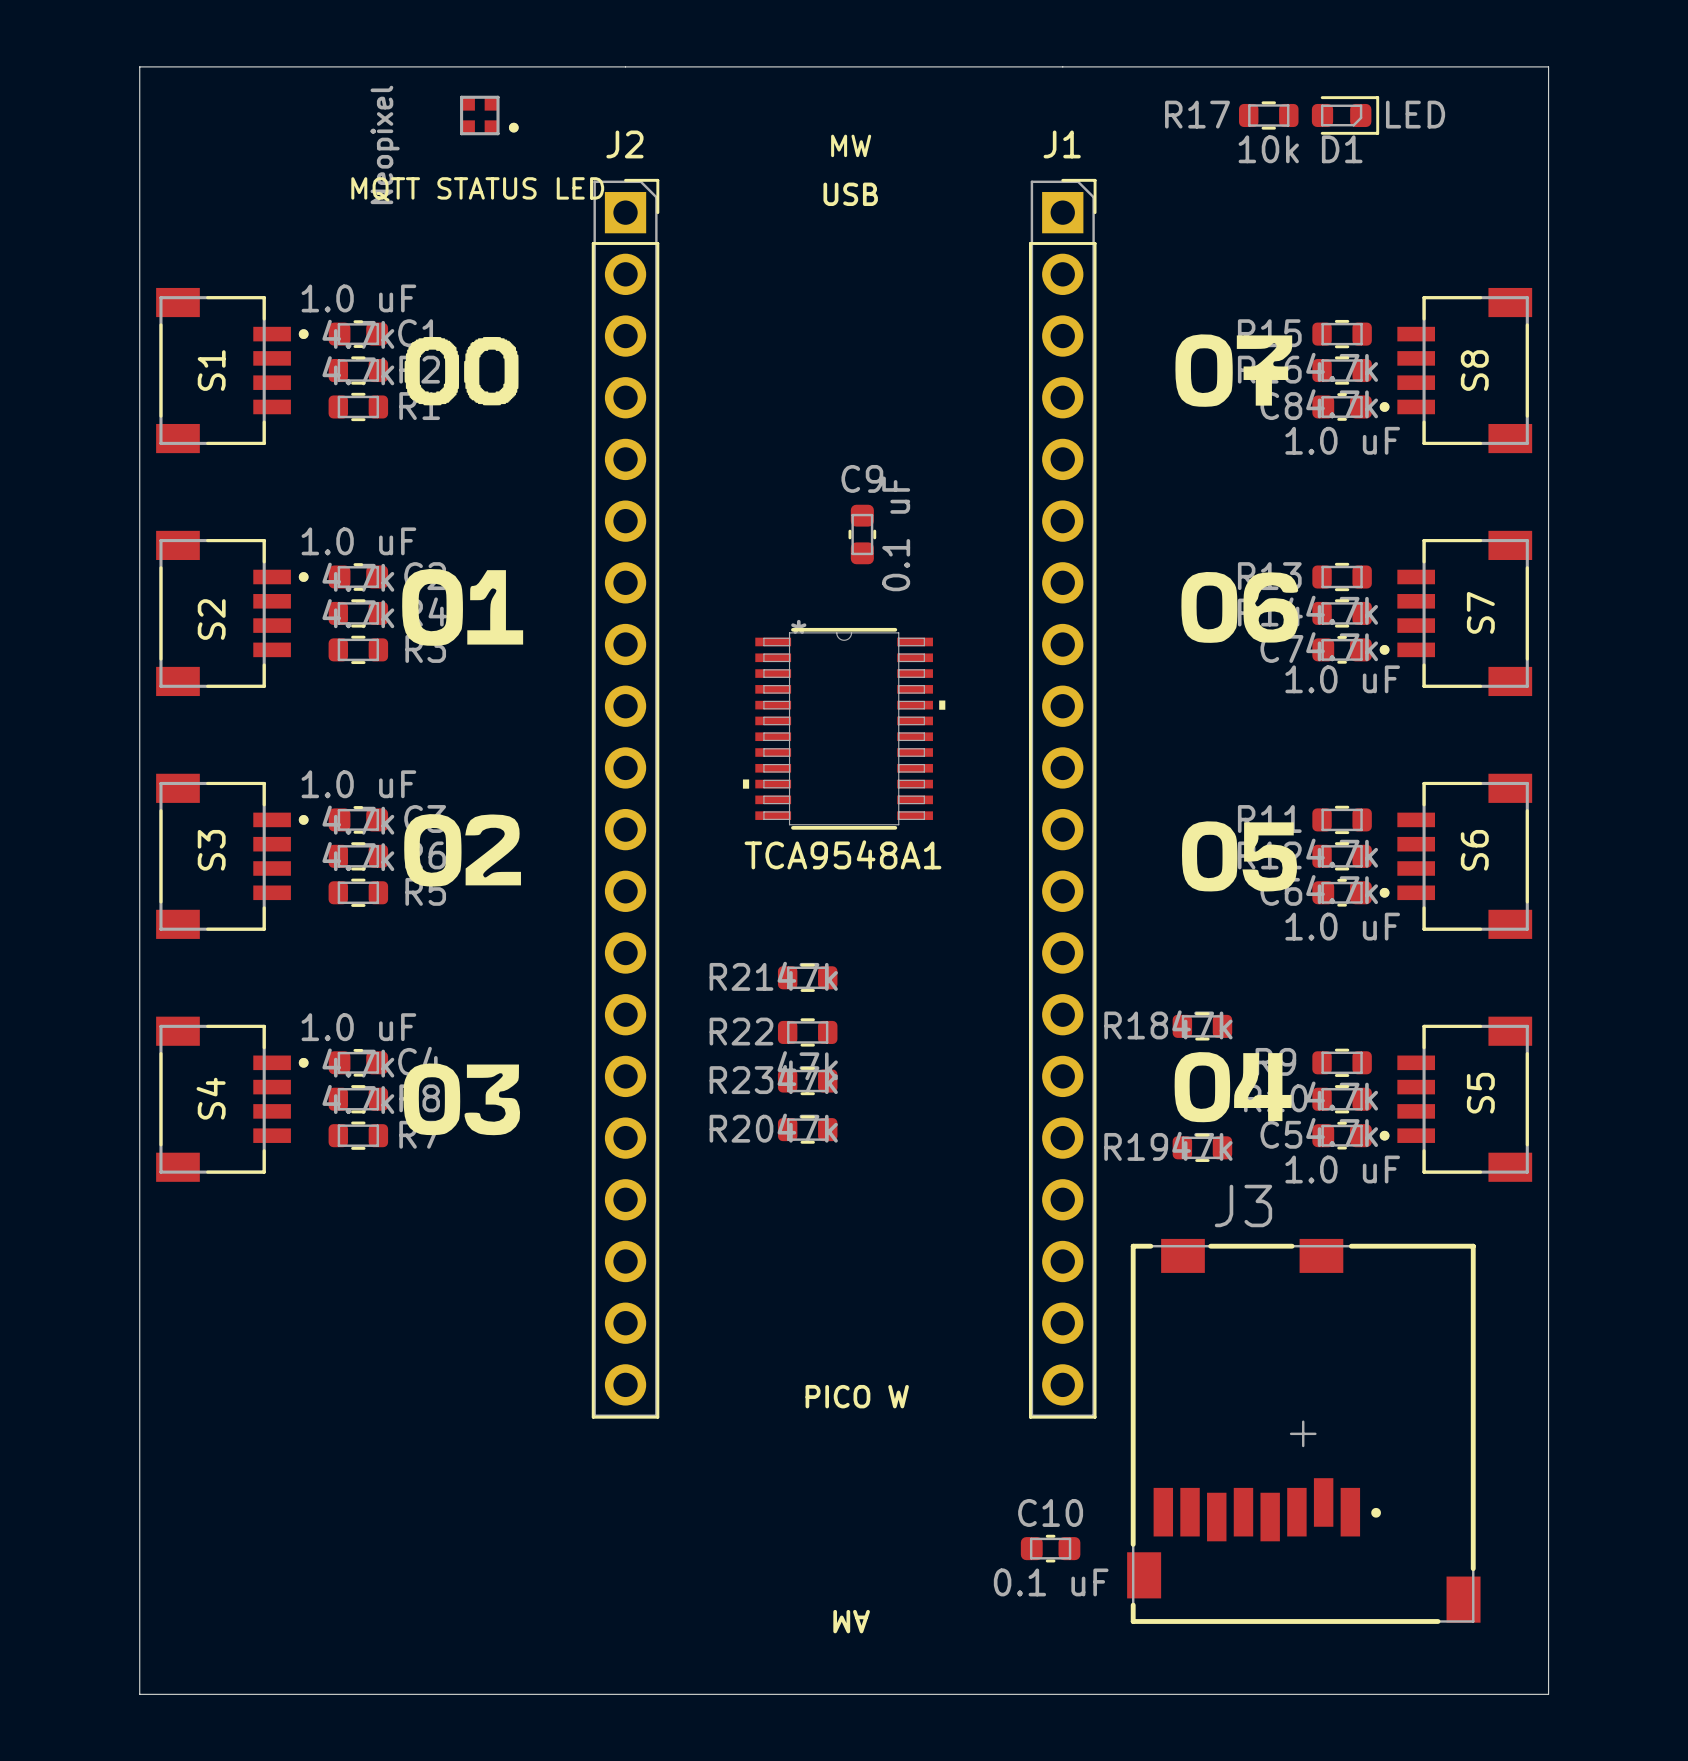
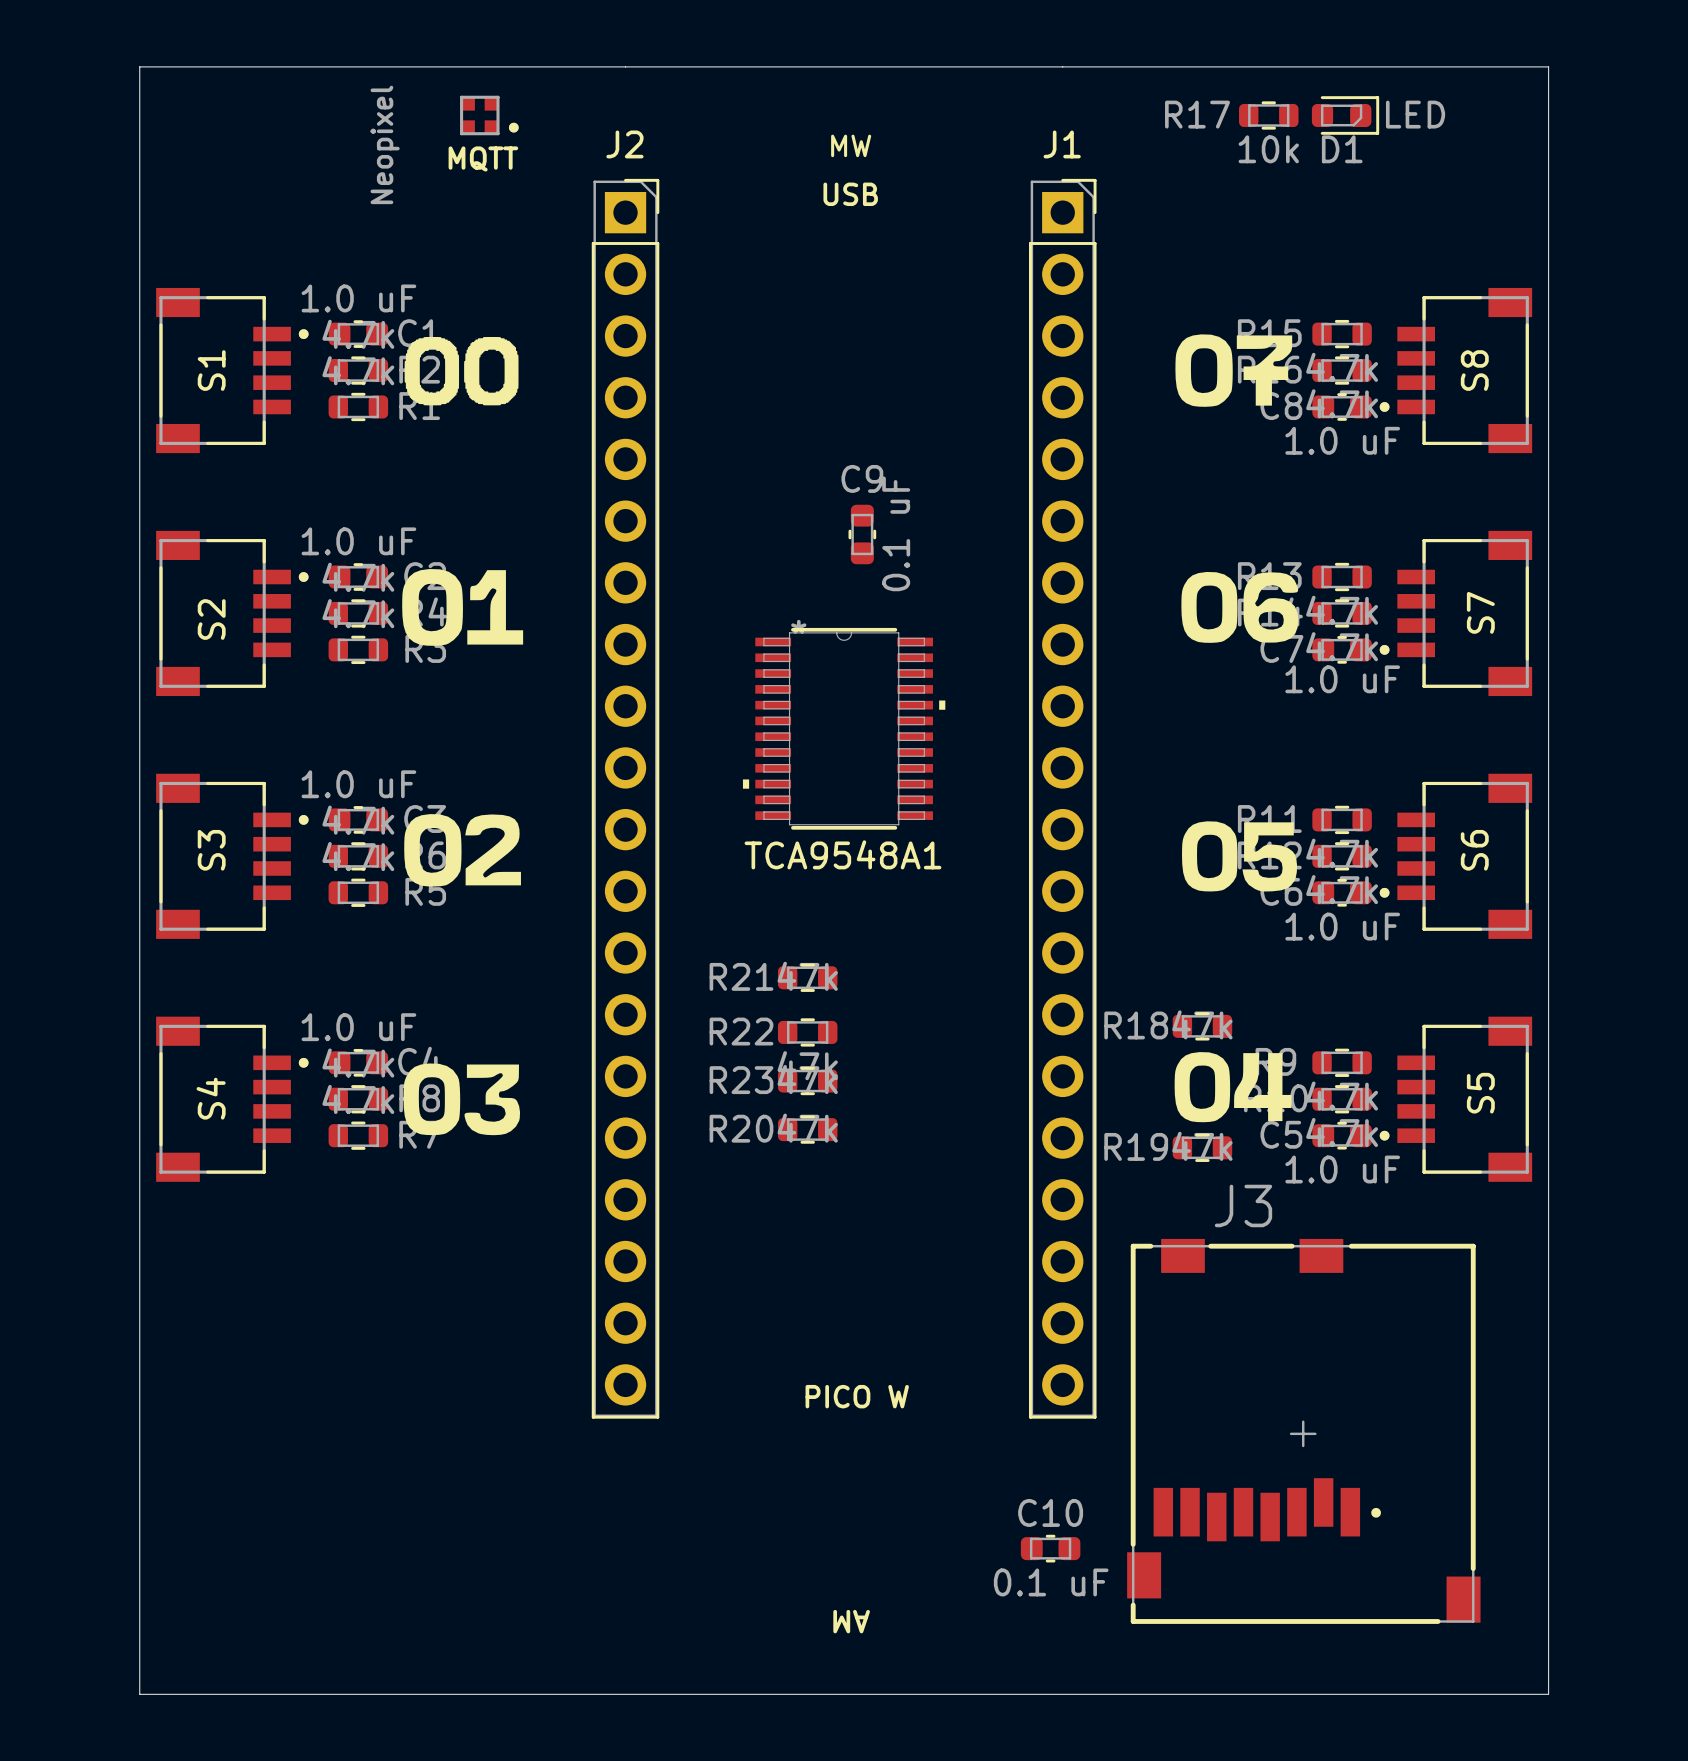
text: none -> MQTT (483, 158)
text: MQTT STATUS LED (477, 189) -> none

